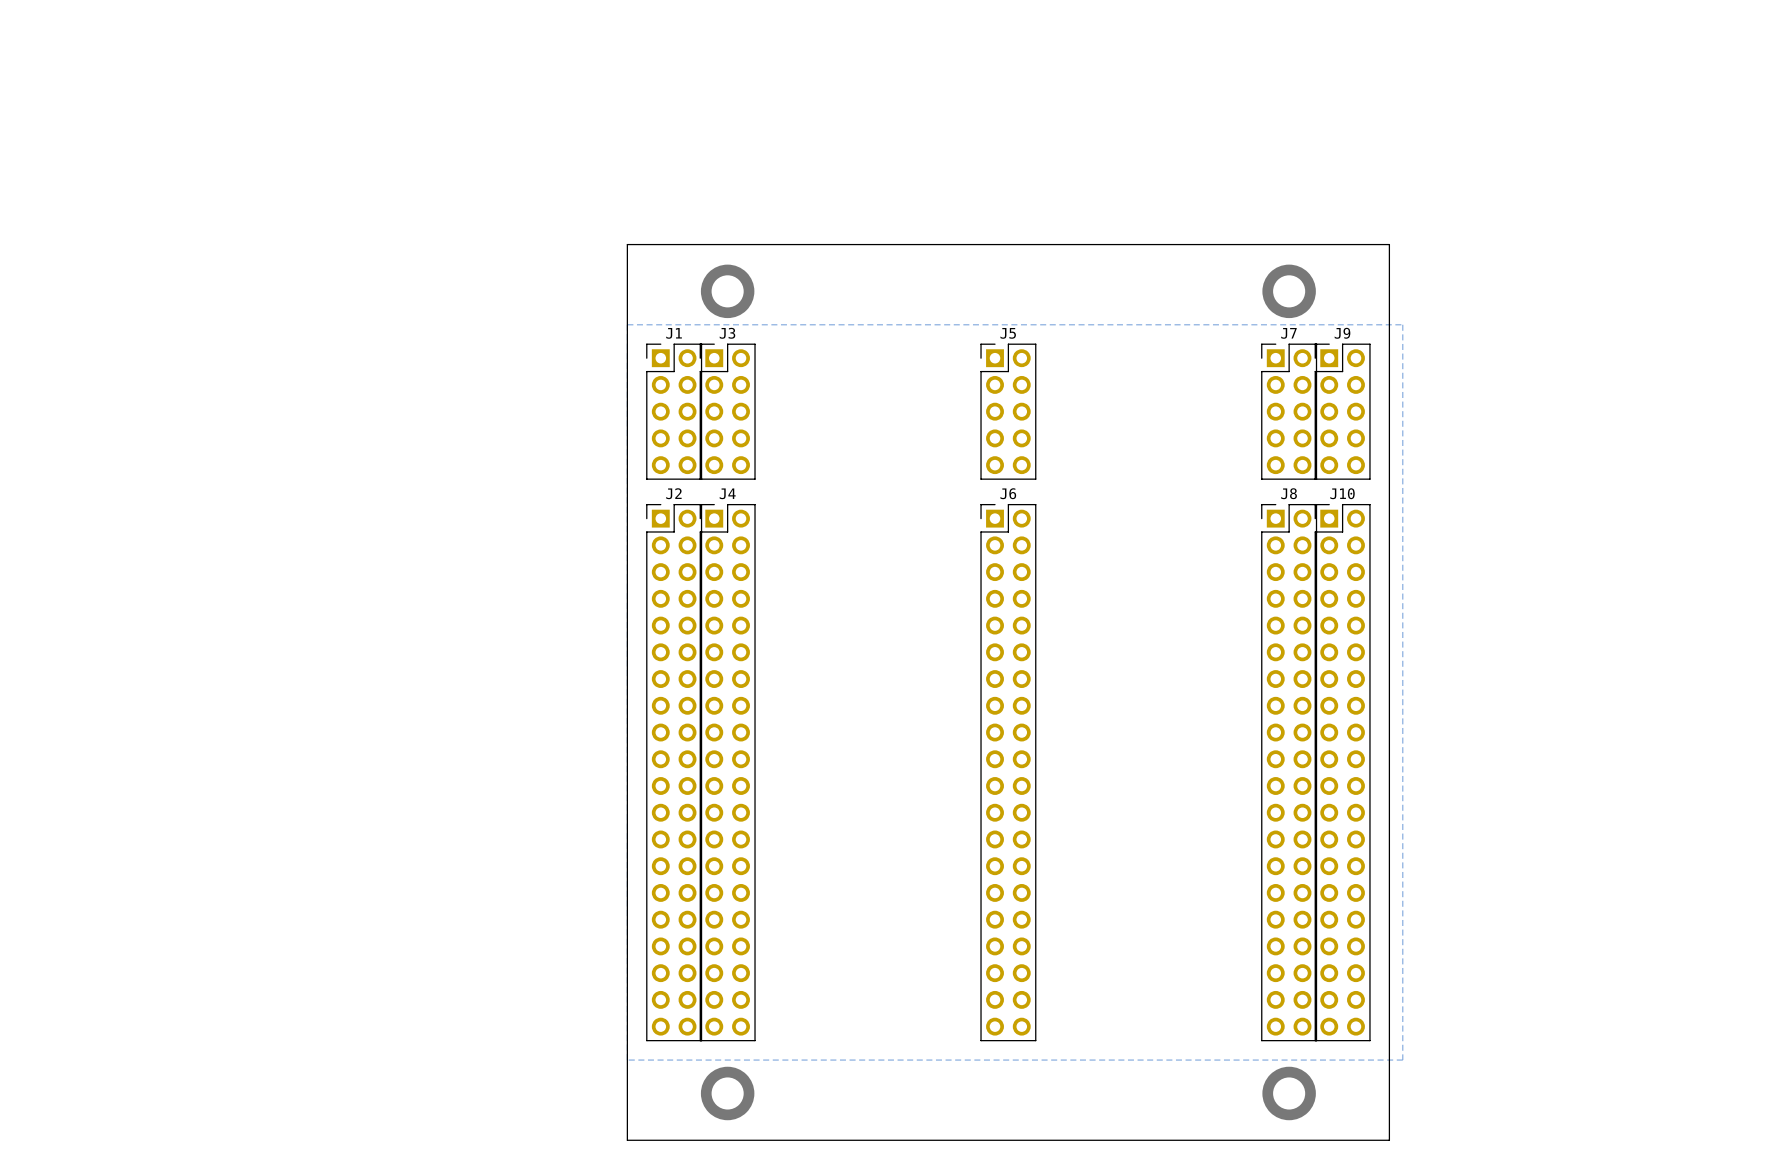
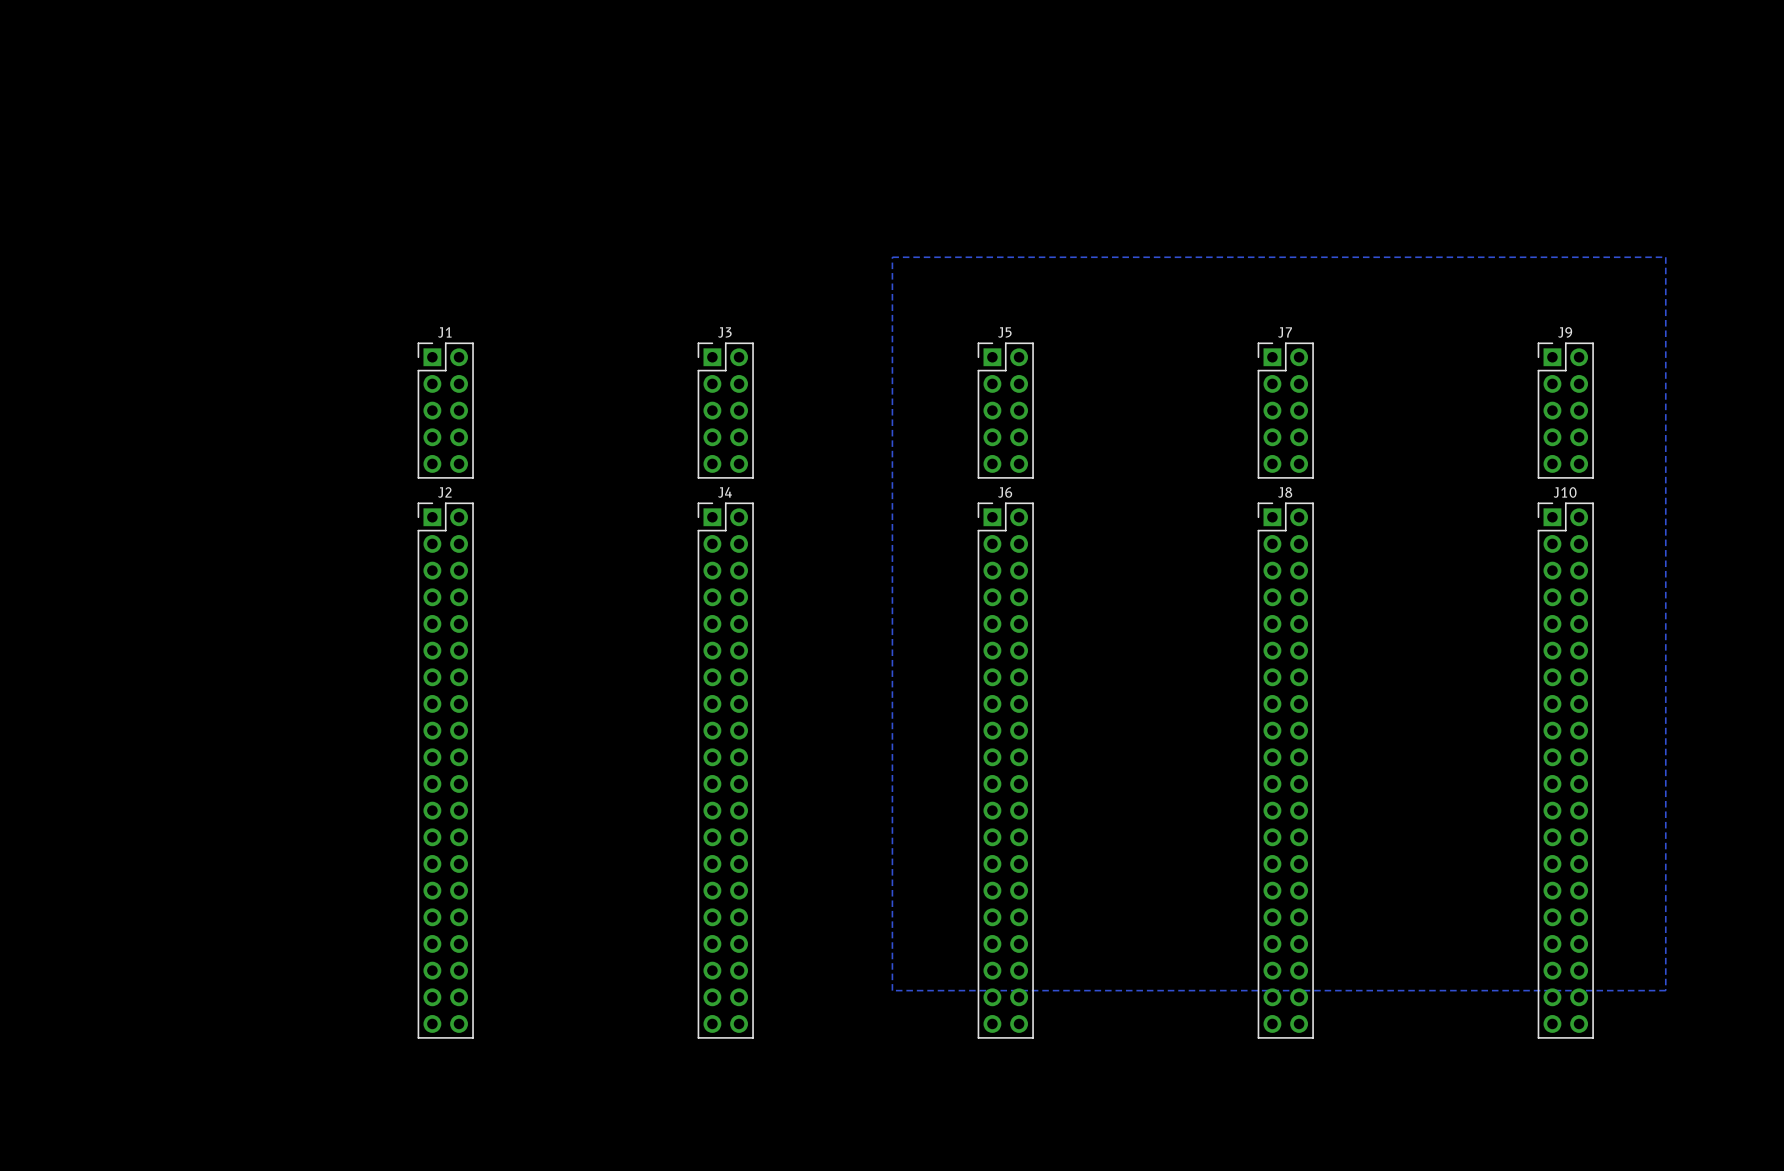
board edge: (627, 244) (627, 1140) (1389, 1140) (1389, 244) (627, 244) -> none
bottom zone outline: none -> (892, 257) (892, 990) (1665, 990) (1665, 257) (892, 257)
via: (727, 291) -> none
via: (1289, 291) -> none
bottom zone outline: (627, 324) (627, 1060) (1402, 1060) (1402, 324) (627, 324) -> none
J1 position: (674, 411) -> (445, 410)
J9 position: (1342, 411) -> (1565, 410)
J2 position: (674, 772) -> (445, 770)
J10 position: (1342, 772) -> (1565, 770)
via: (727, 1093) -> none
via: (1289, 1093) -> none

